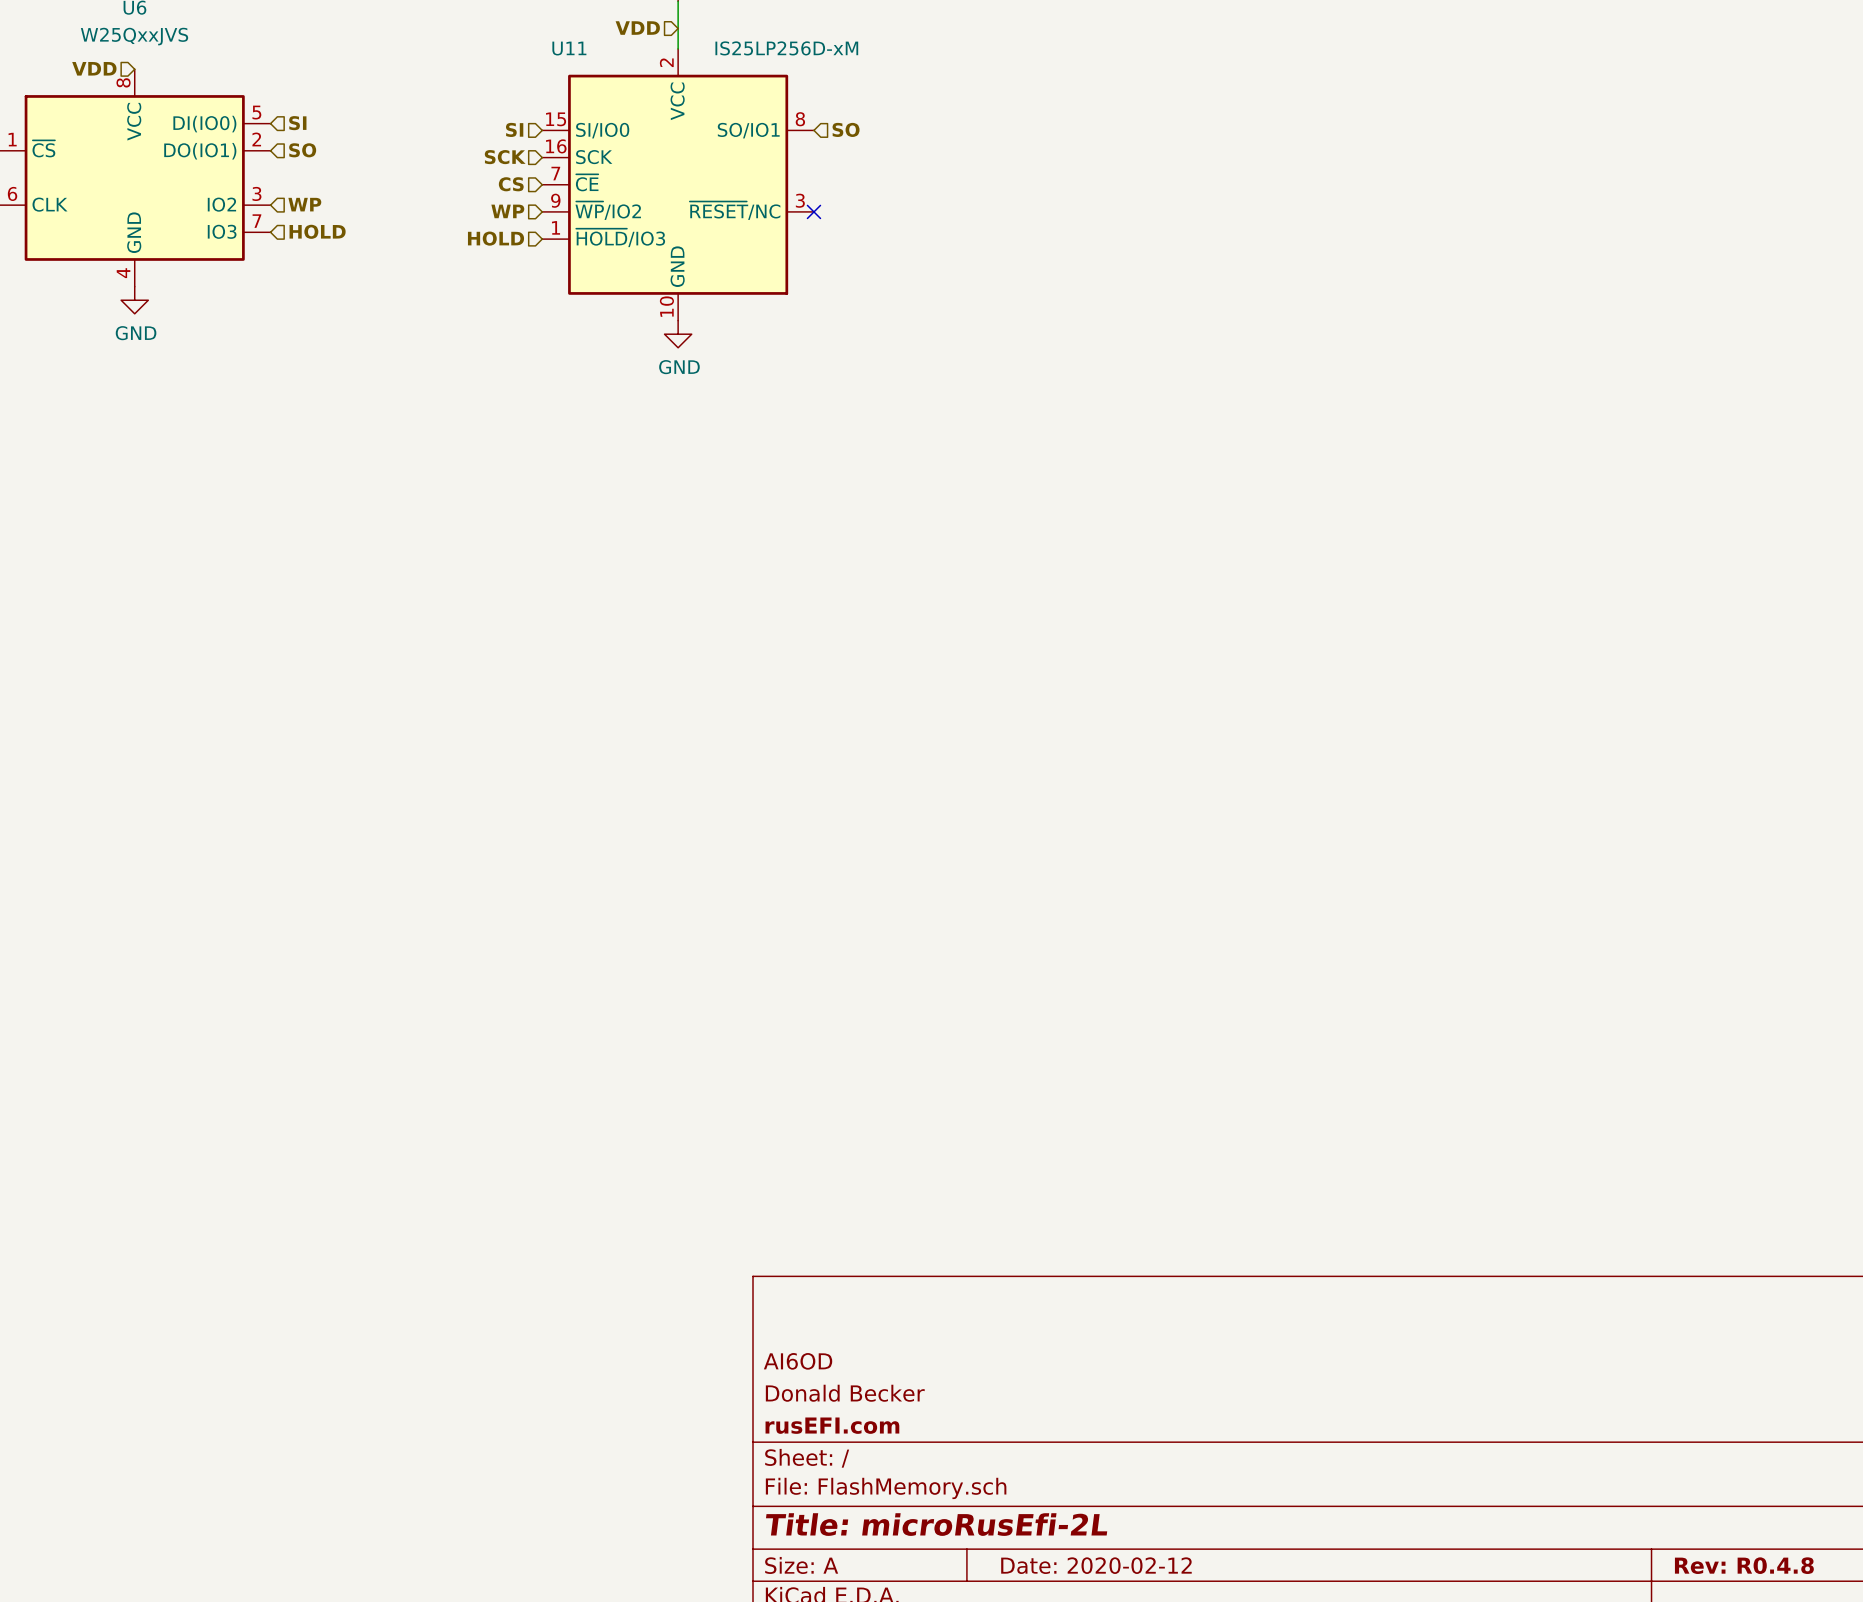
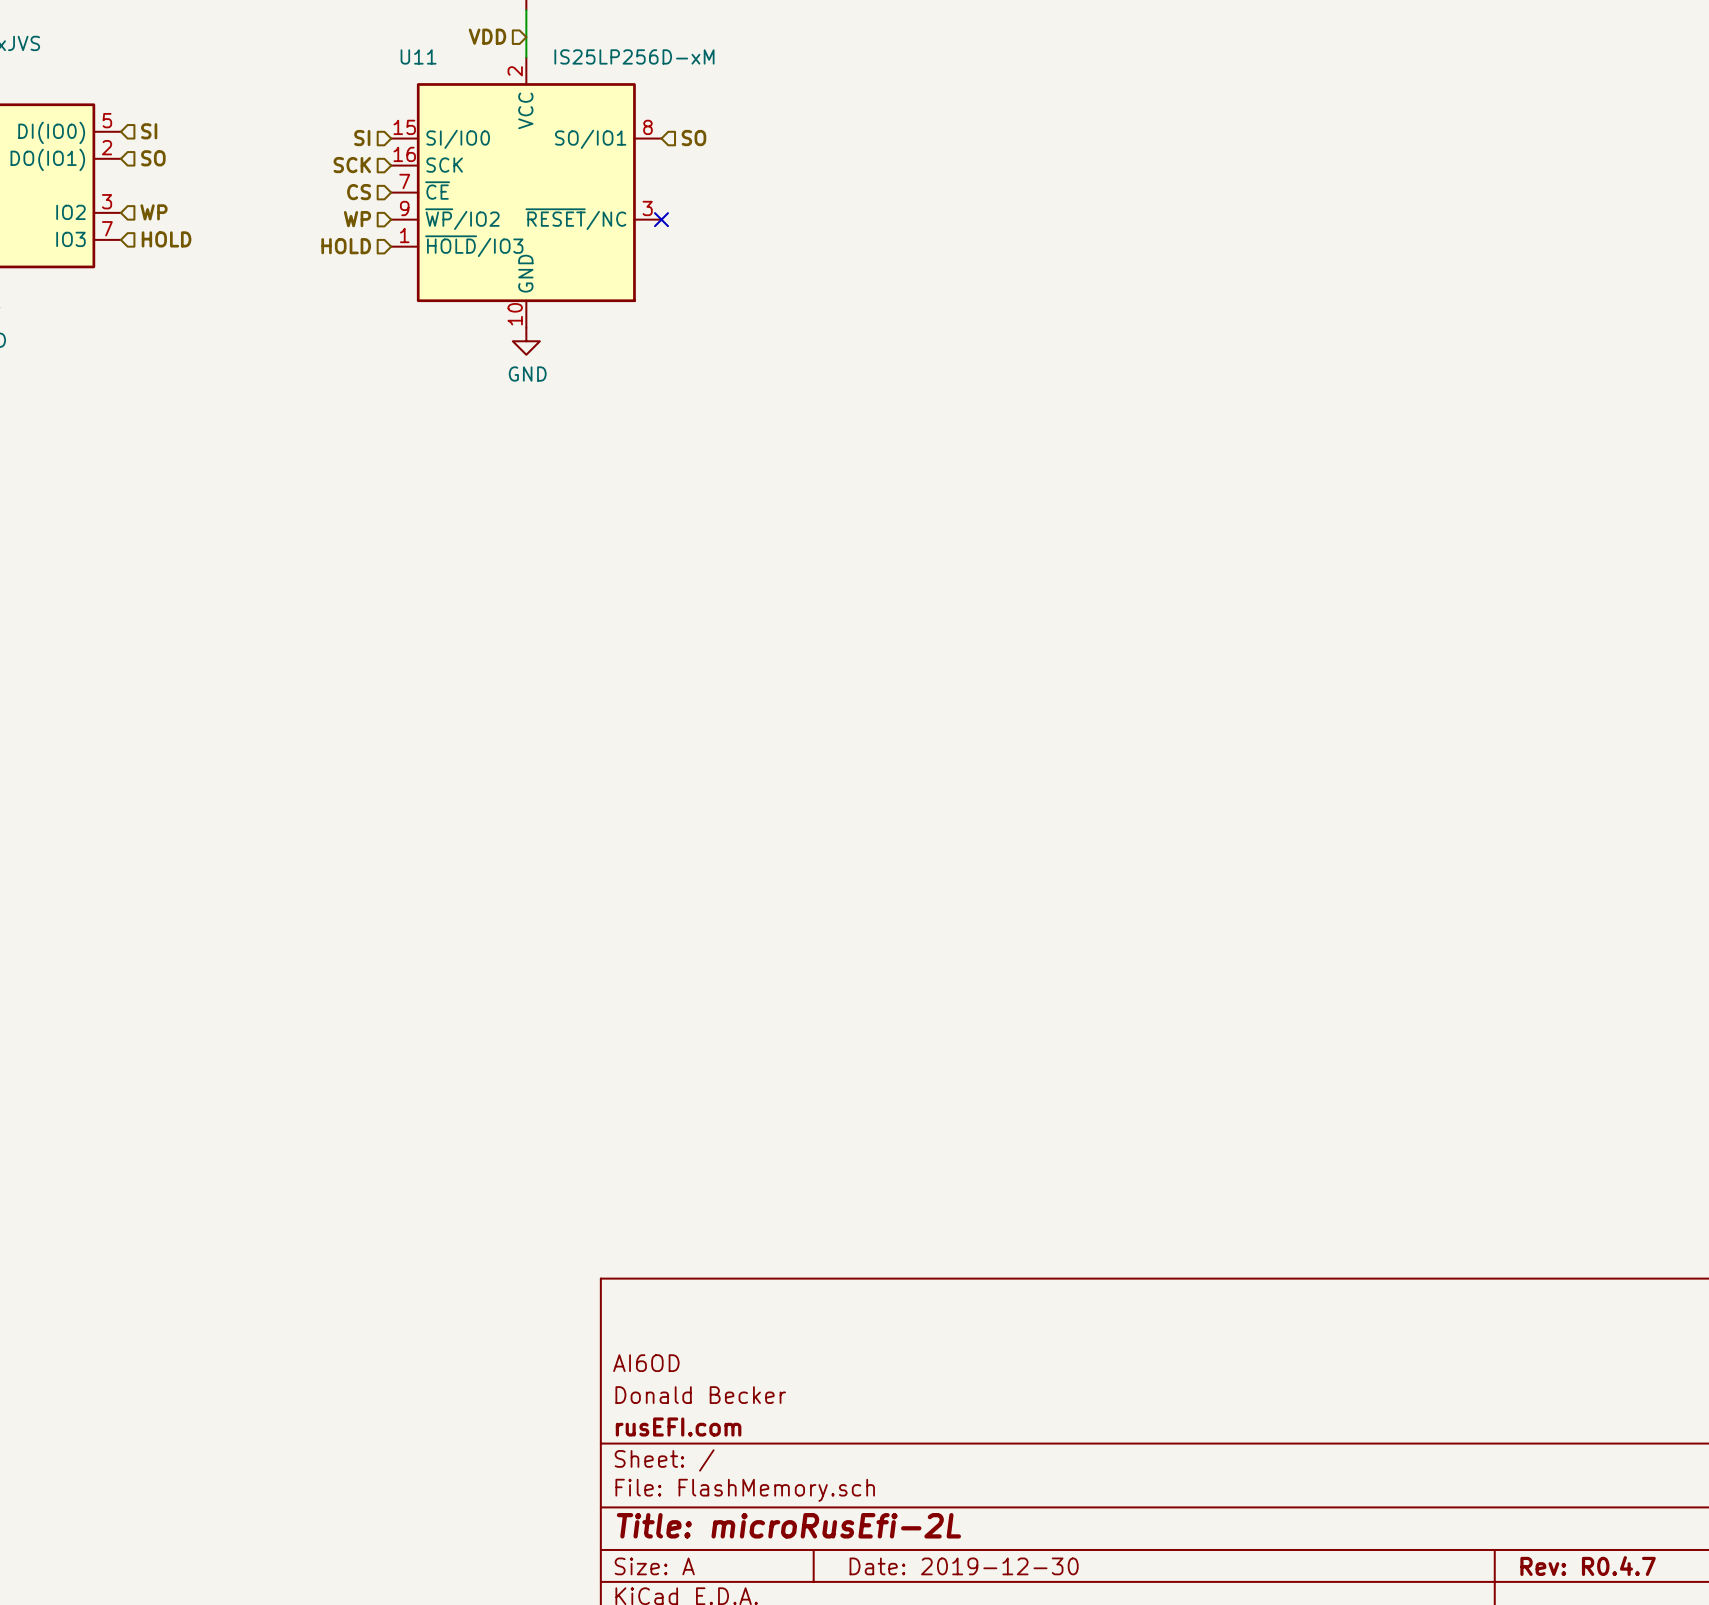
title block: Date: 2020-02-12 (1096, 1565) -> Date: 2019-12-30 (964, 1566)
title block: Rev: R0.4.8 (1744, 1565) -> Rev: R0.4.7 (1588, 1566)

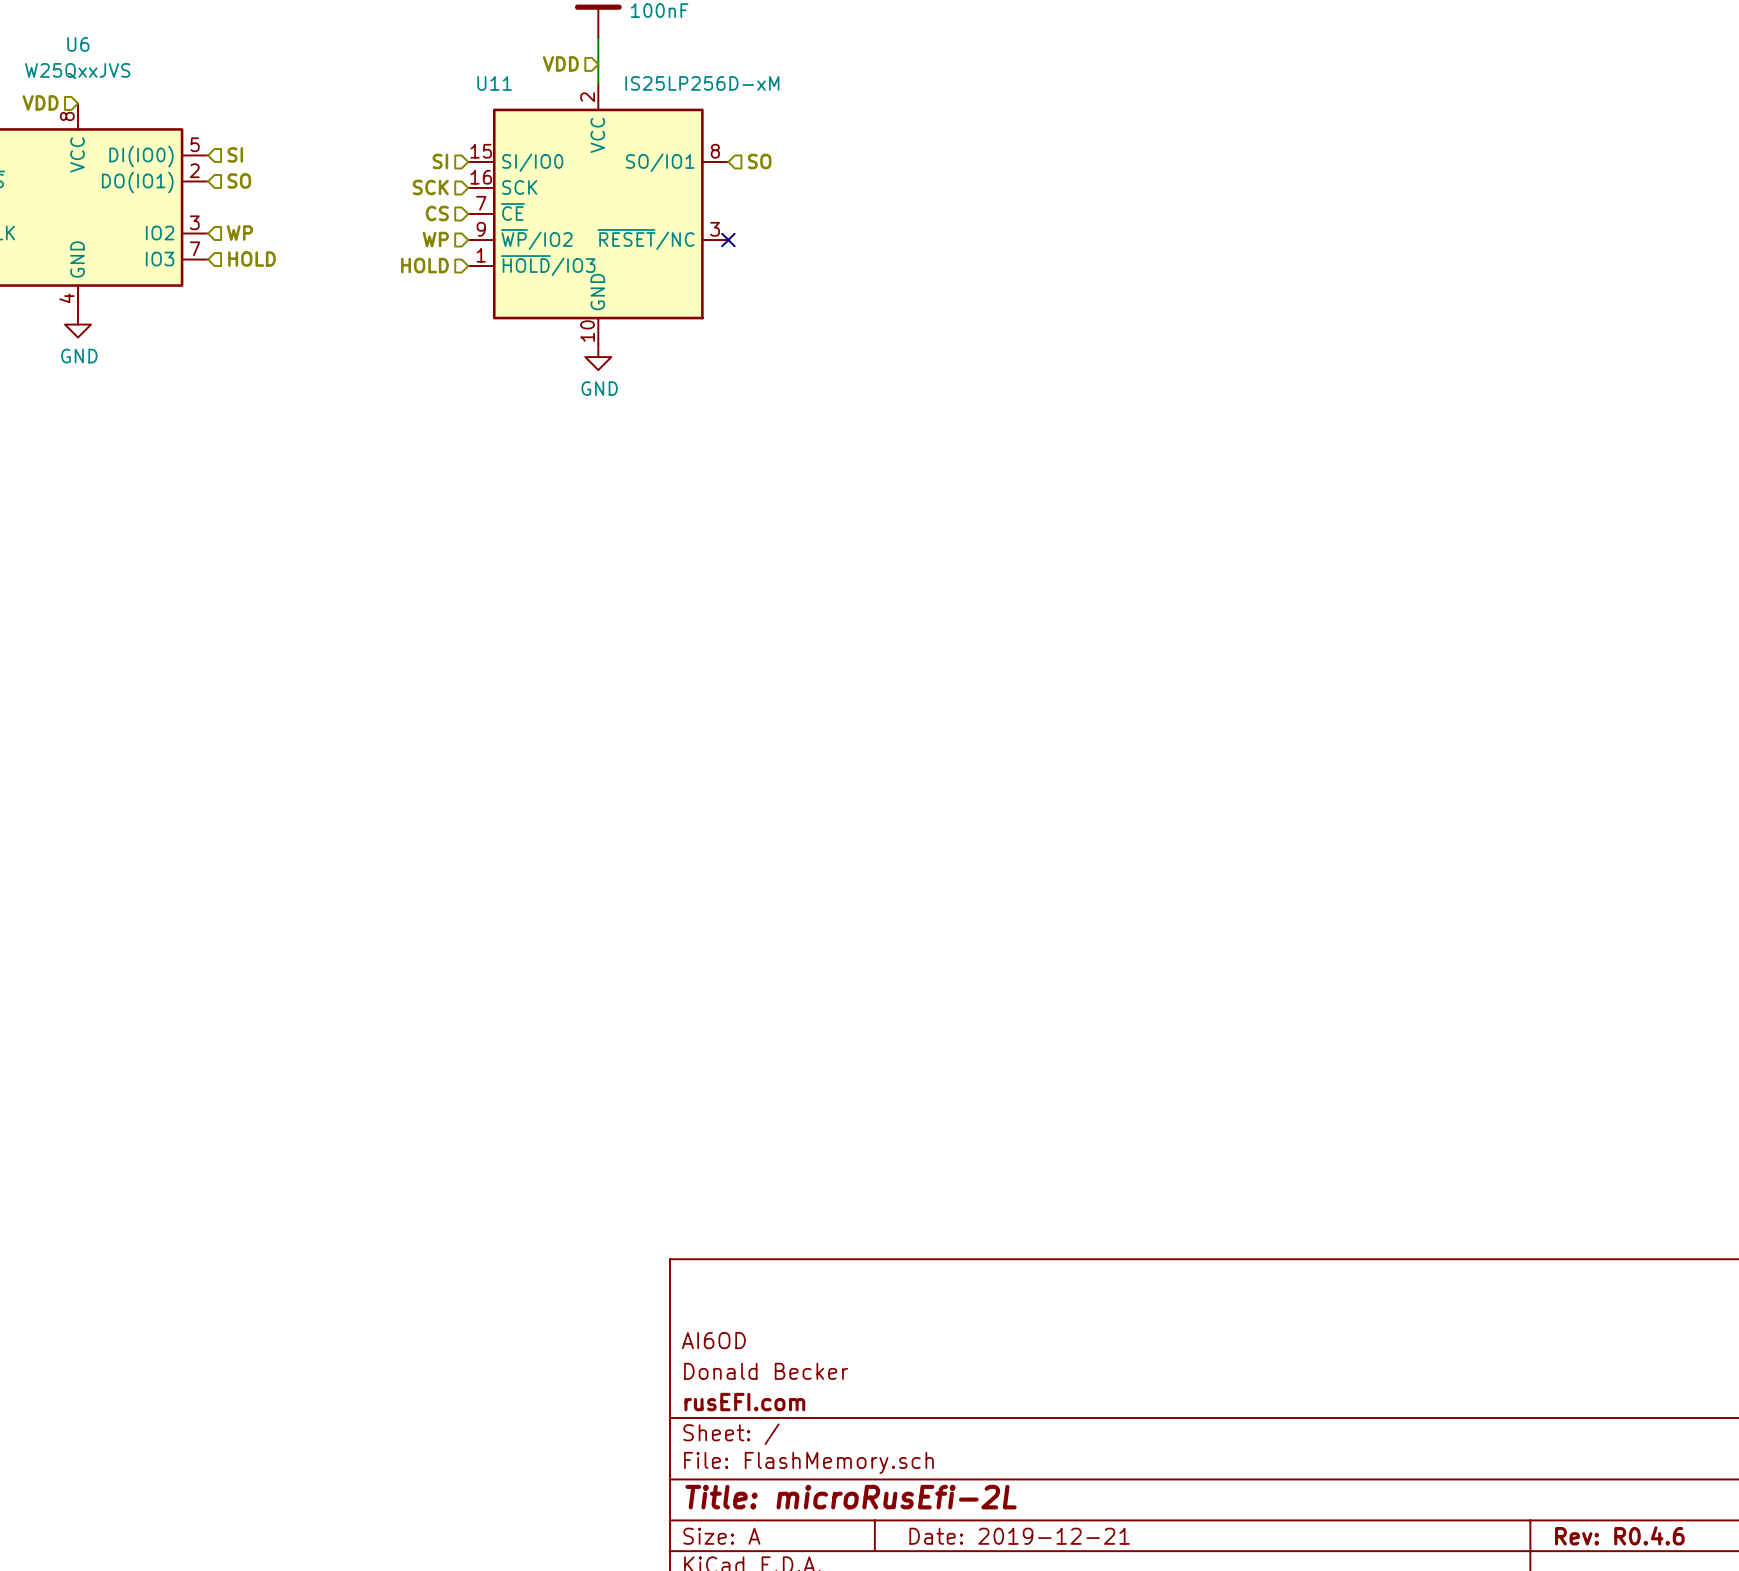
title block: Date: 2019-12-30 (964, 1566) -> Date: 2019-12-21 (1019, 1536)
title block: Rev: R0.4.7 (1588, 1566) -> Rev: R0.4.6 (1619, 1535)

